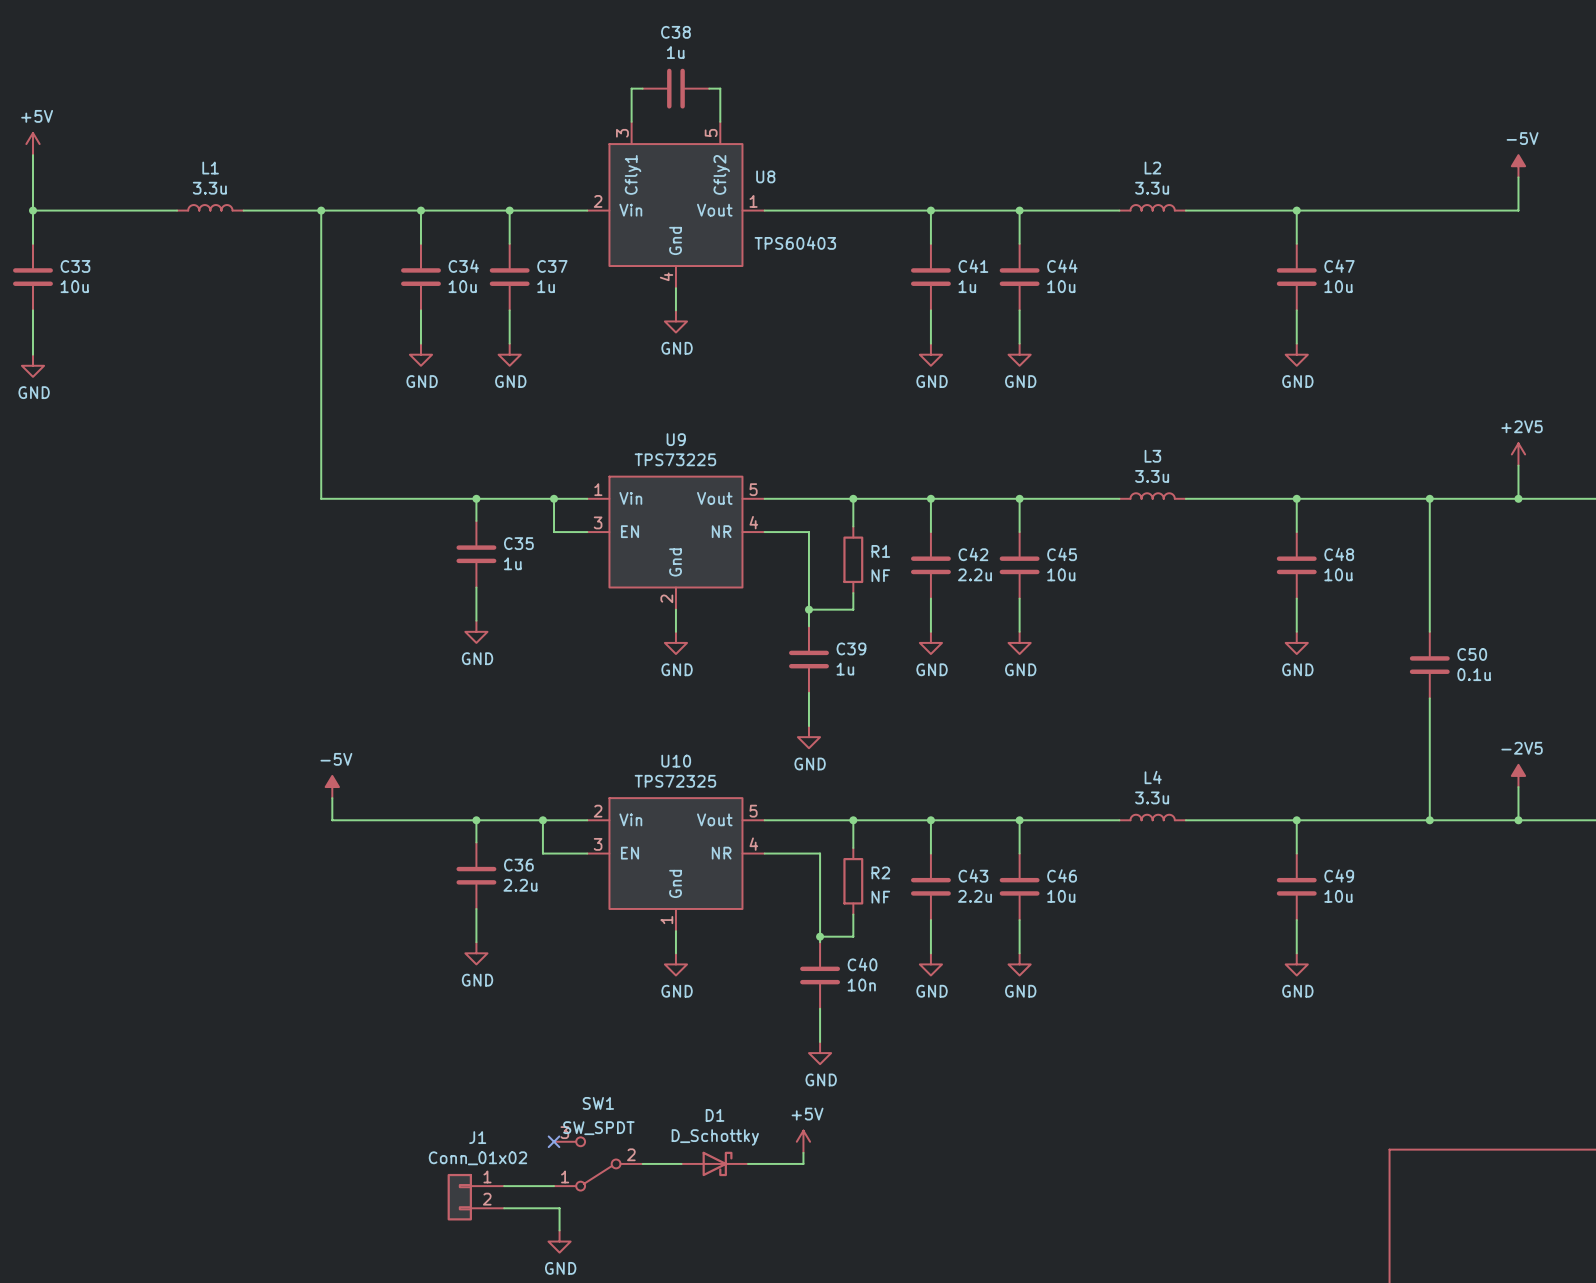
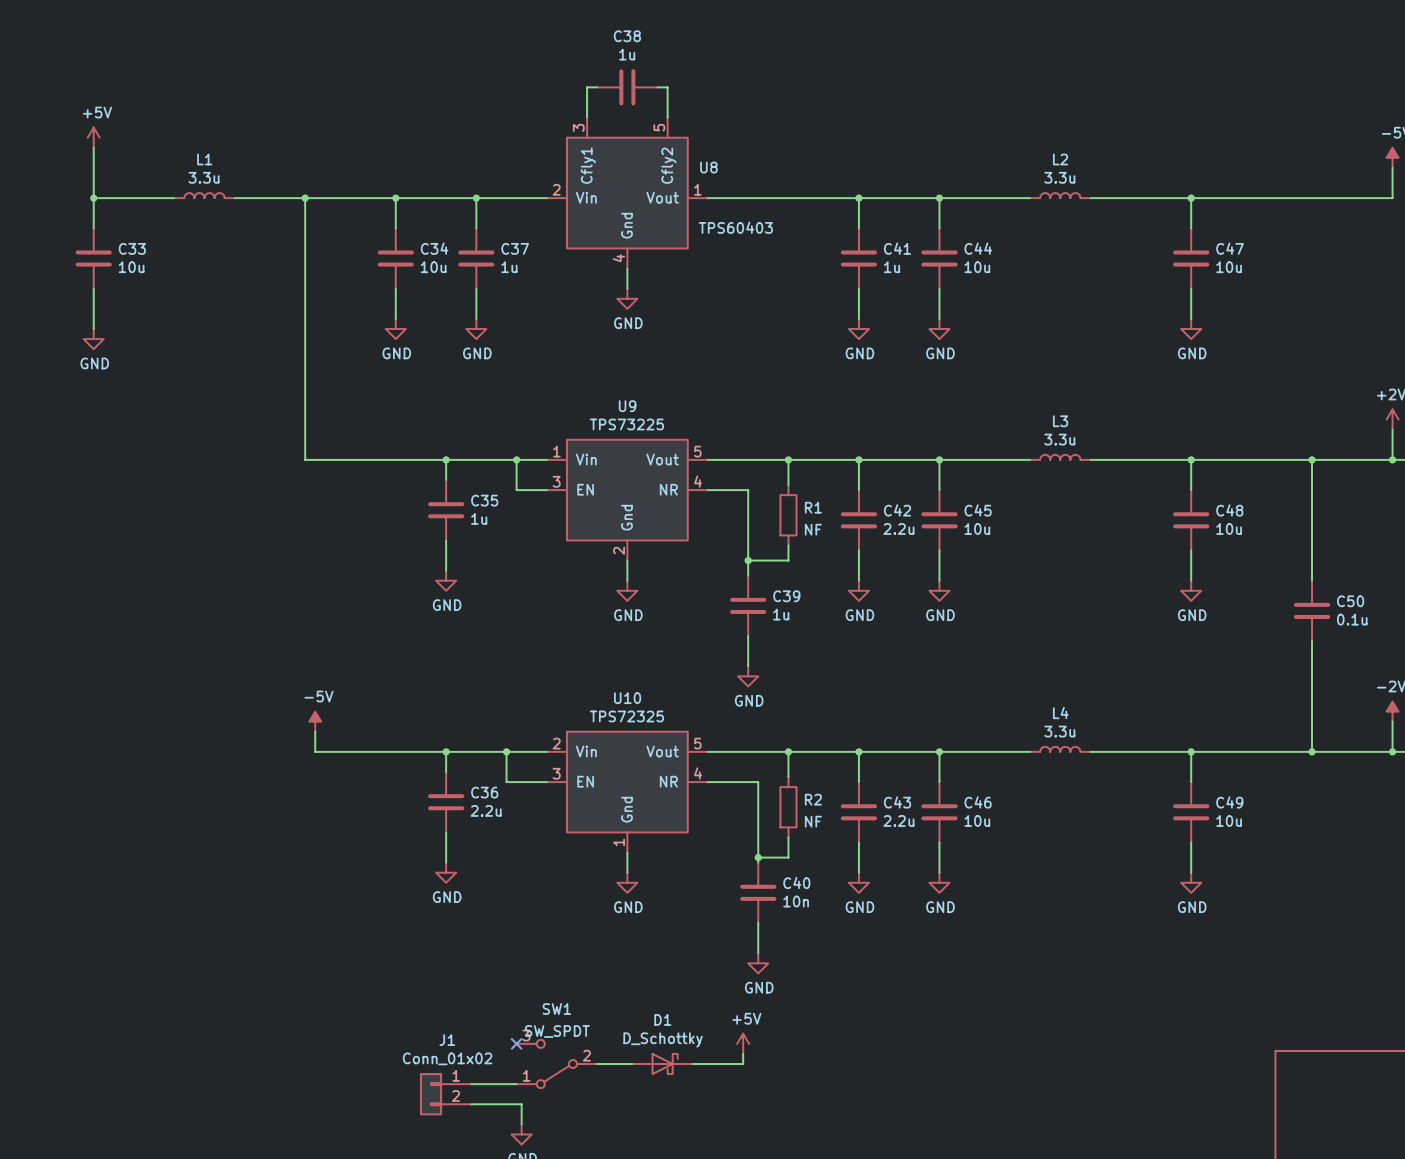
power symbol position: +5V (32, 144) -> +5V (93, 137)
wire: (32, 155) (32, 243) -> (93, 147) (93, 228)
wire: (32, 210) (88, 210) -> none
junction: (32, 210) -> none
junction: none -> (93, 198)
C33 position: (32, 277) -> (93, 258)
wire: (32, 310) (32, 354) -> (93, 288) (93, 329)
power symbol position: GND (32, 365) -> GND (93, 339)

